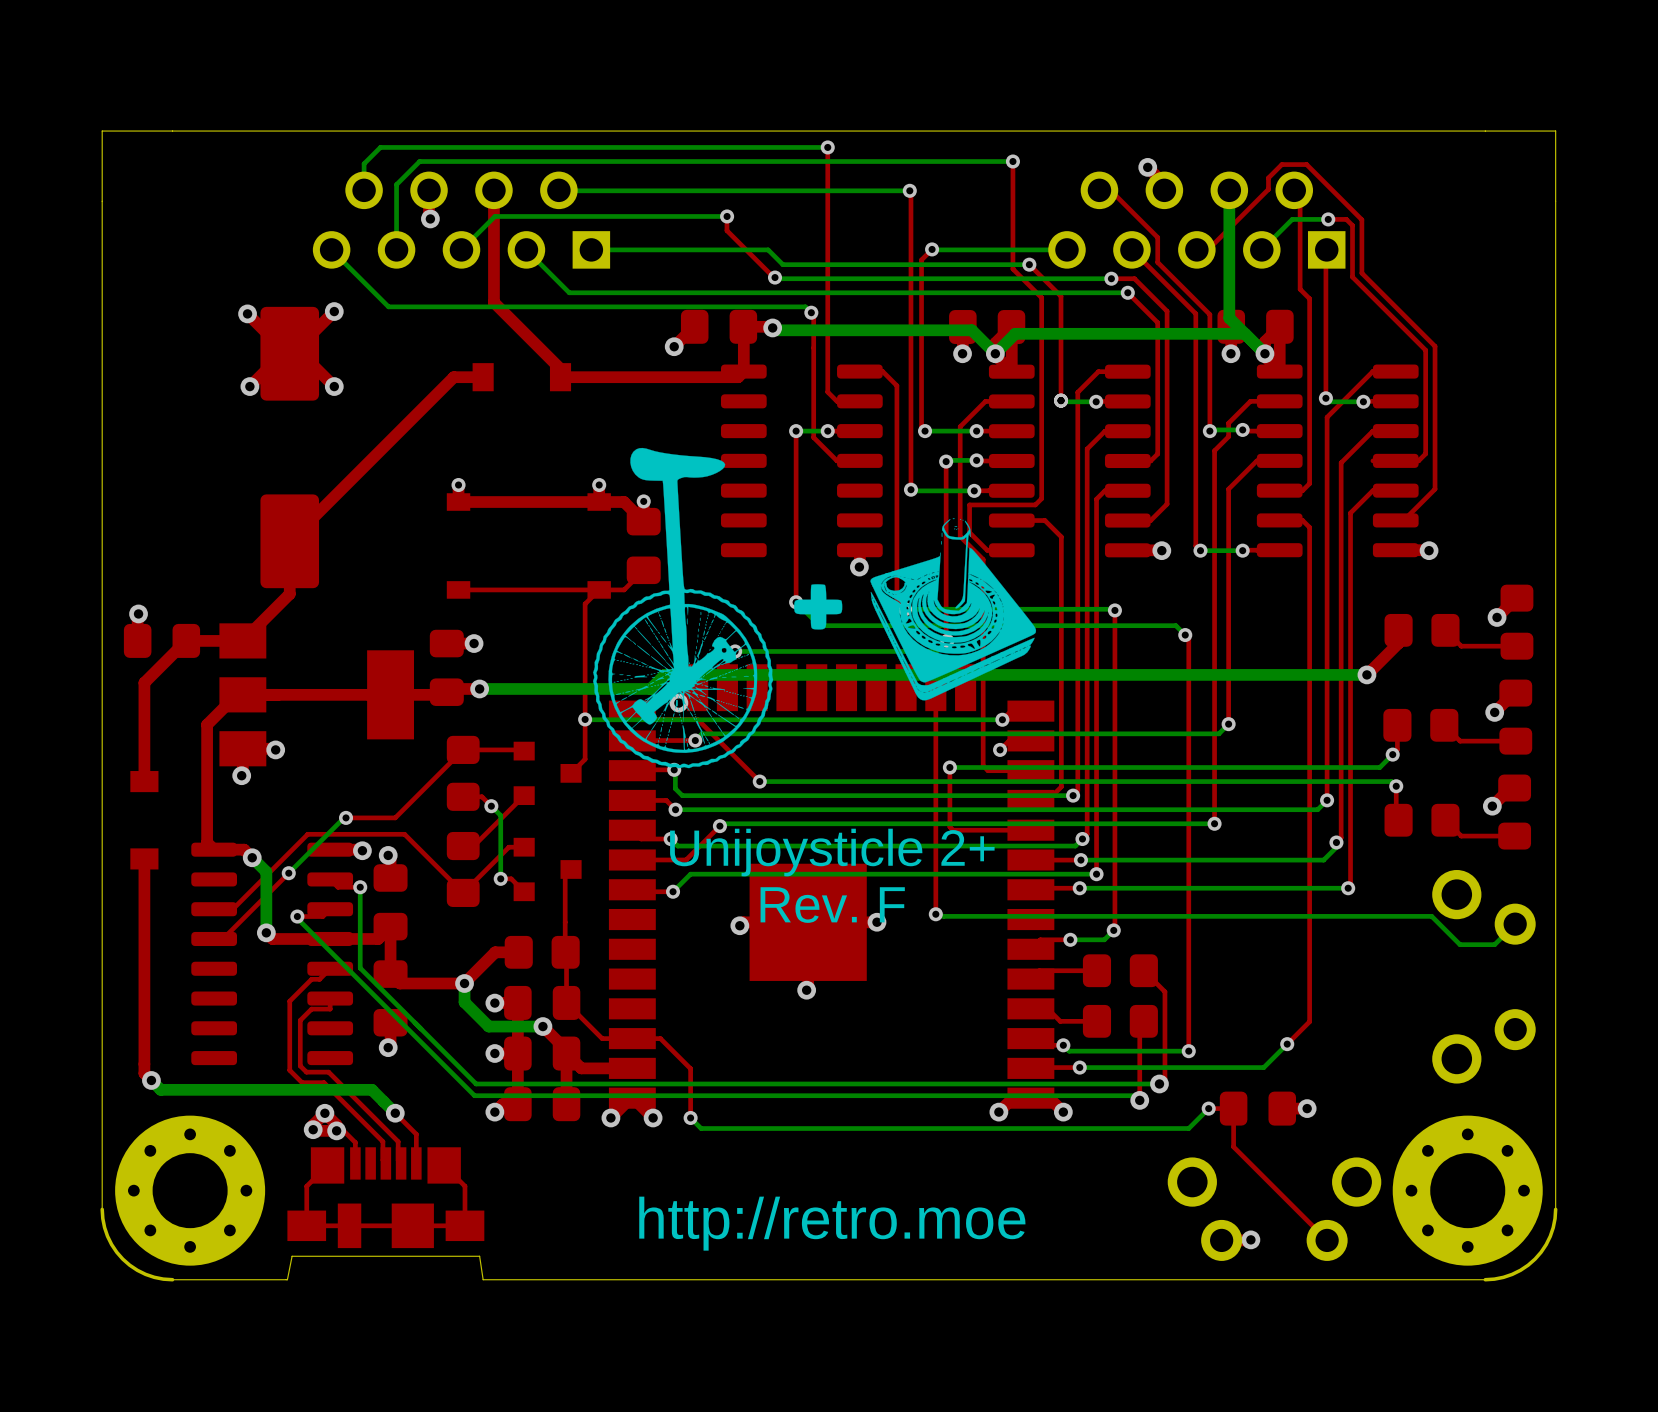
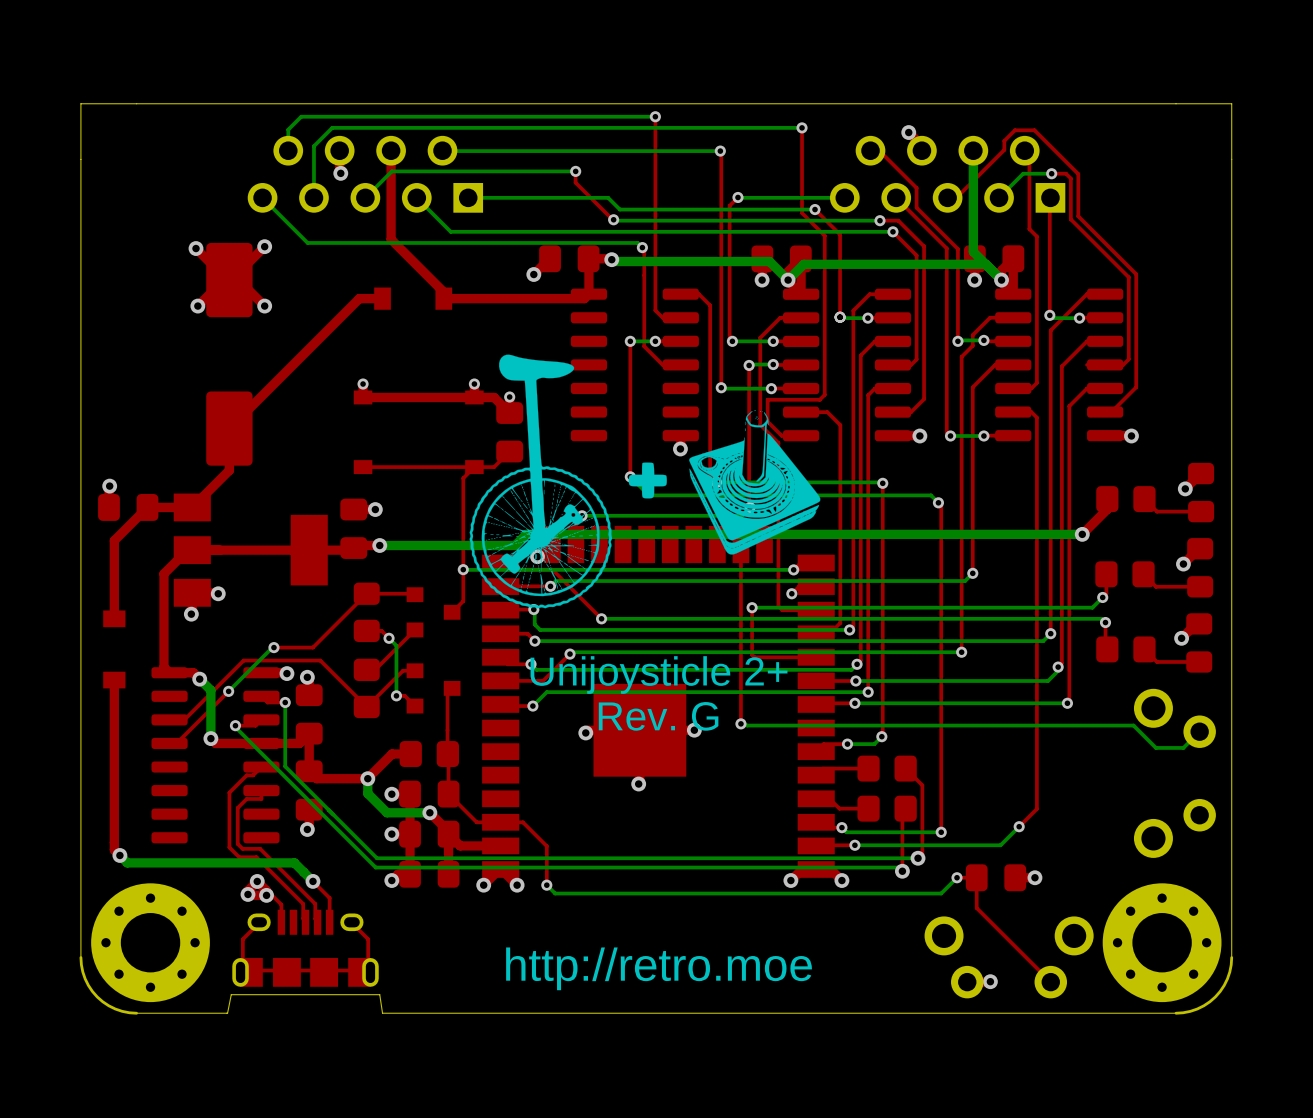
text: Rev. F (832, 905) -> Rev. G (658, 716)
part footprint: [287, 1147, 485, 1249] -> [232, 909, 379, 987]

